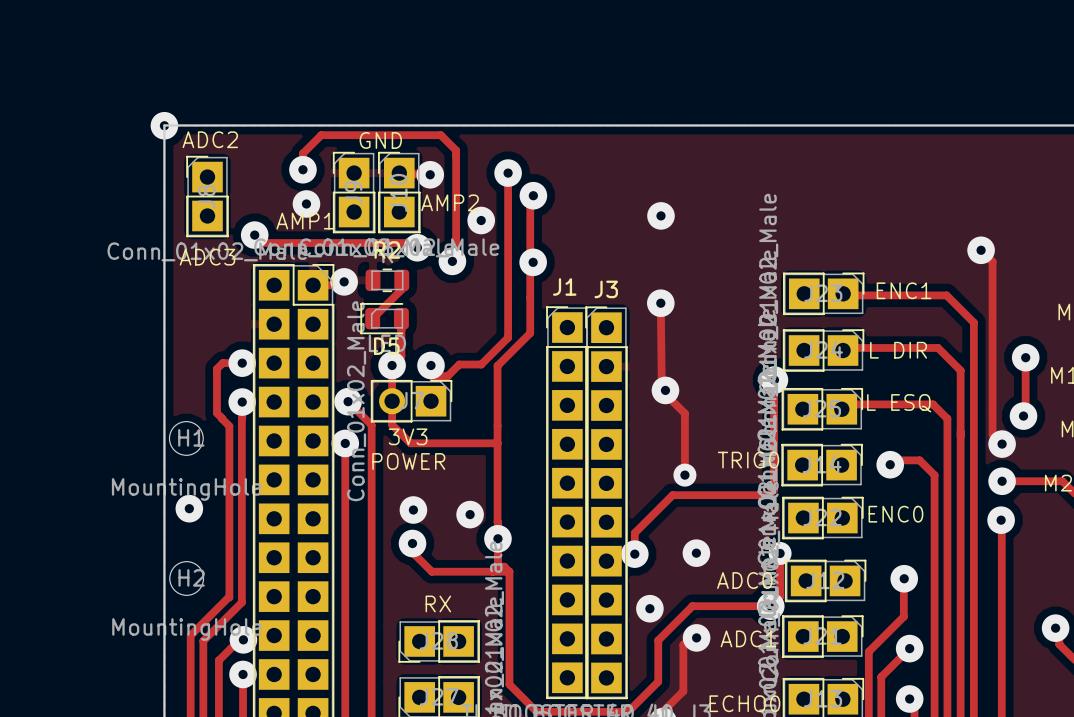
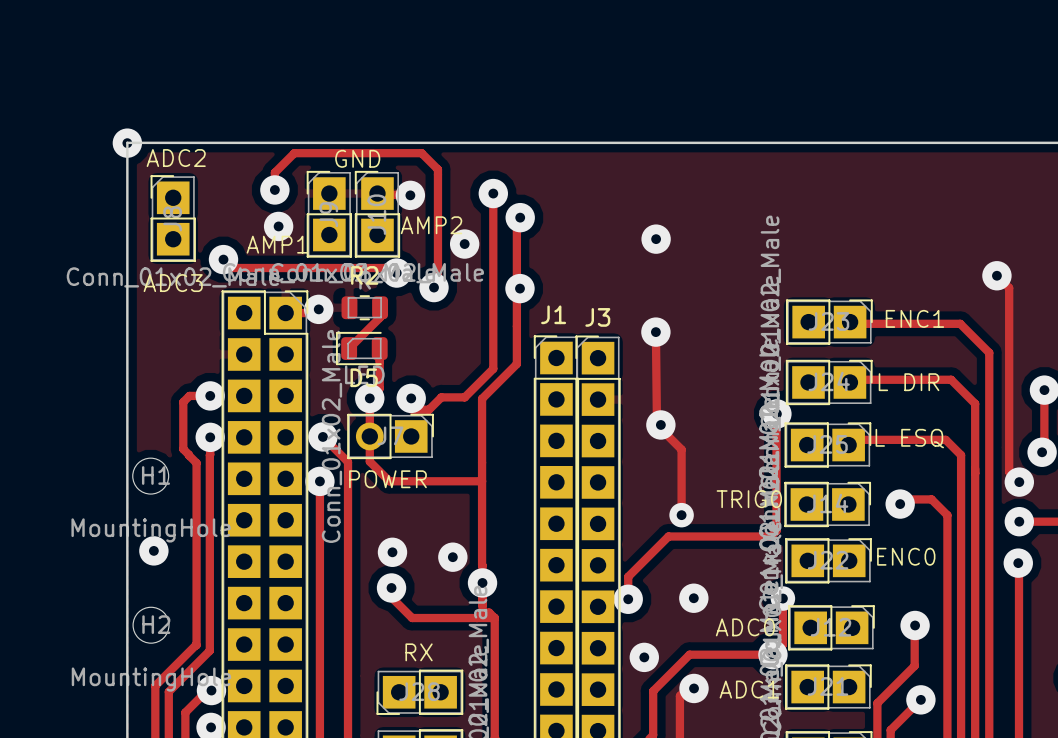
text: 3V3 (408, 436) -> POWER (387, 479)
text: POWER (408, 461) -> none

